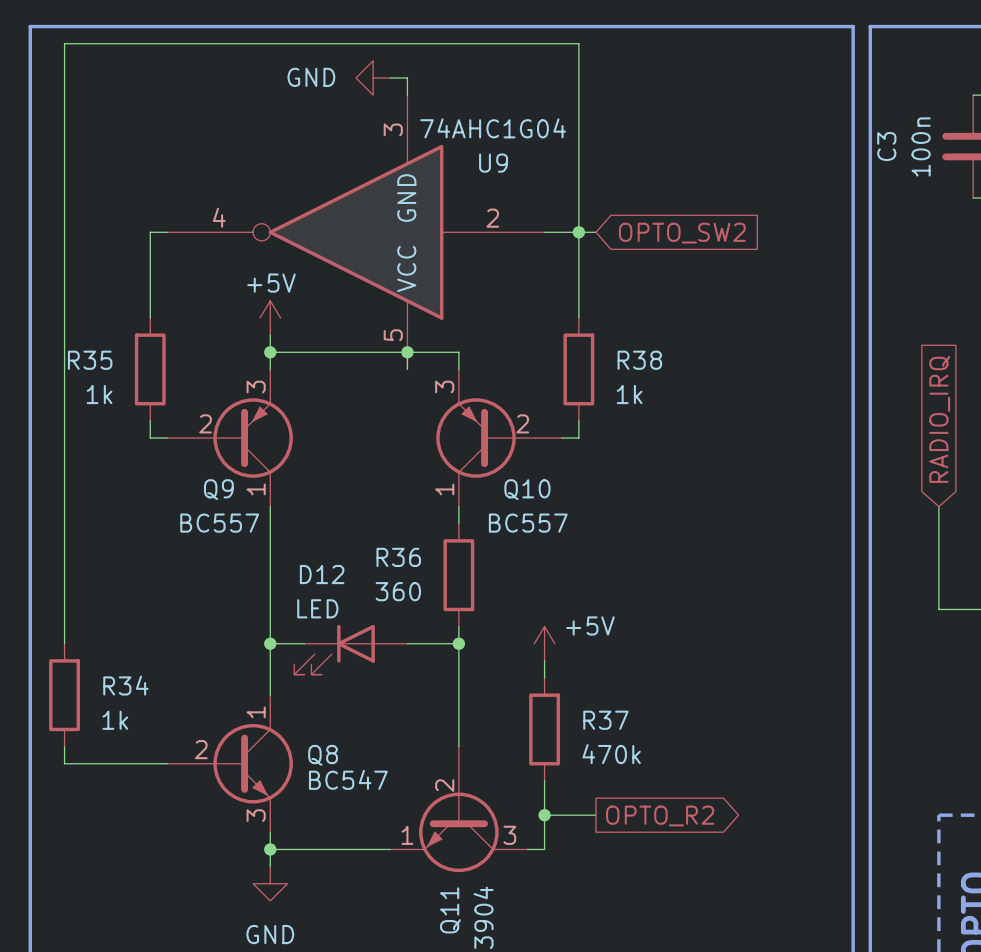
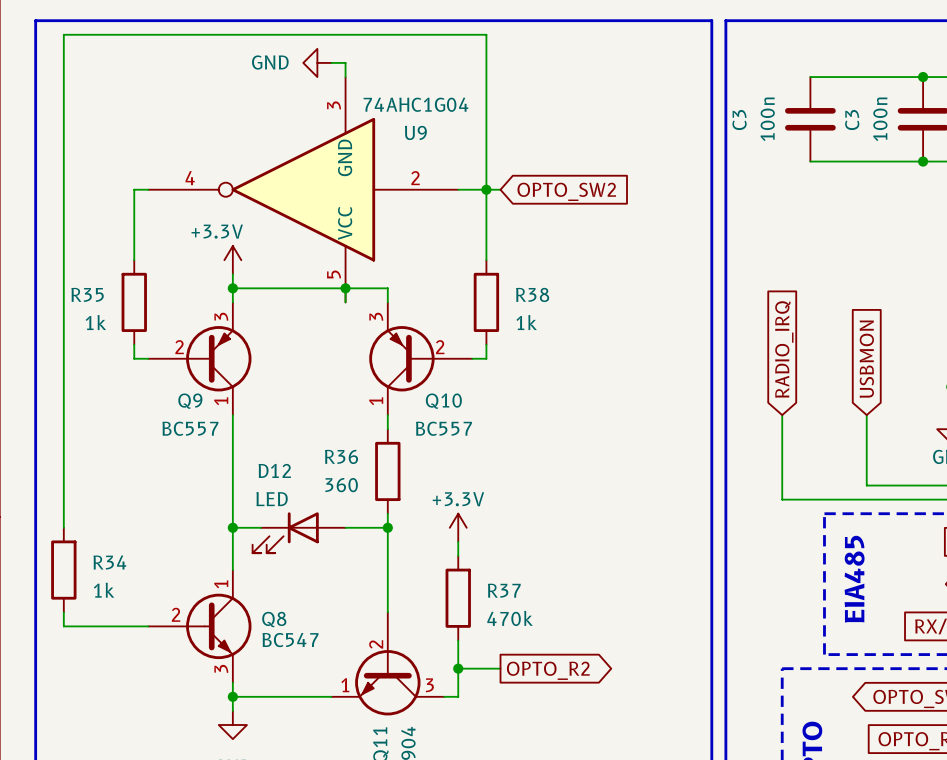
power symbol: +5V (270, 318) -> +3.3V (232, 260)
power symbol: +5V (544, 643) -> +3.3V (458, 527)

